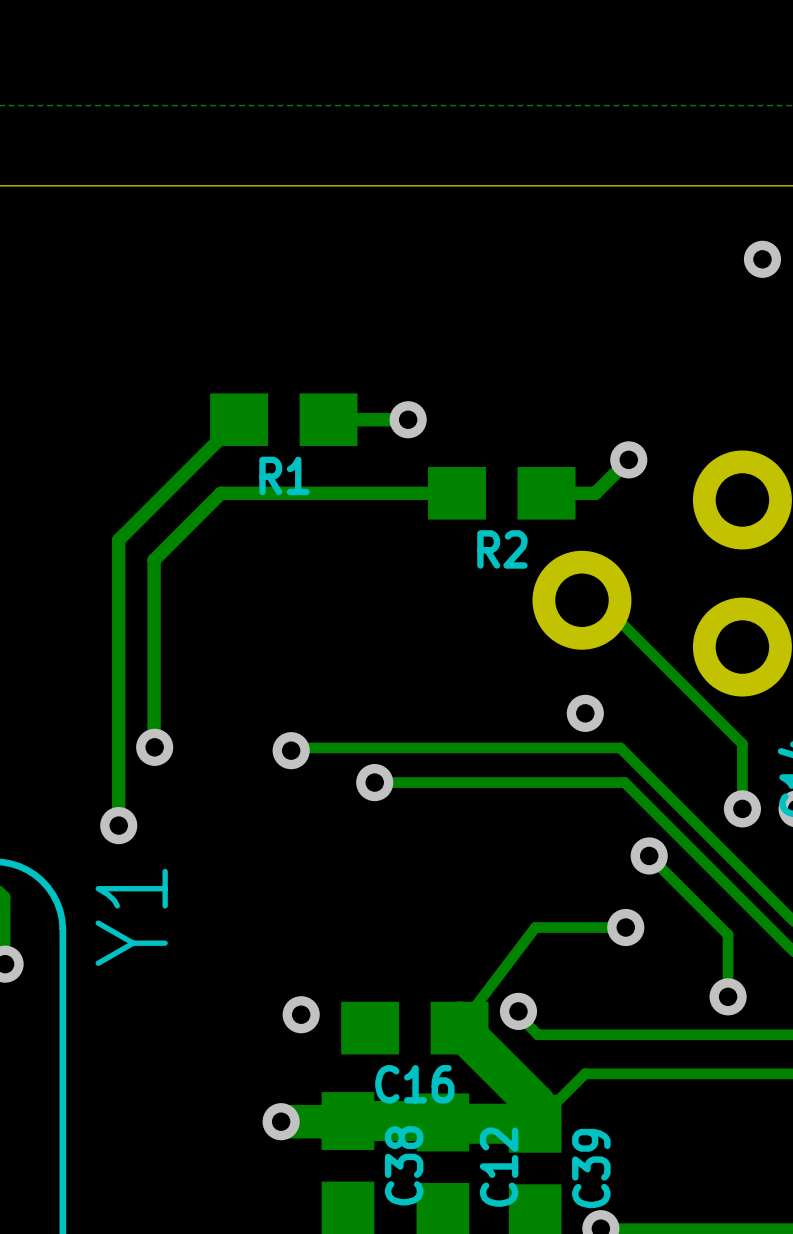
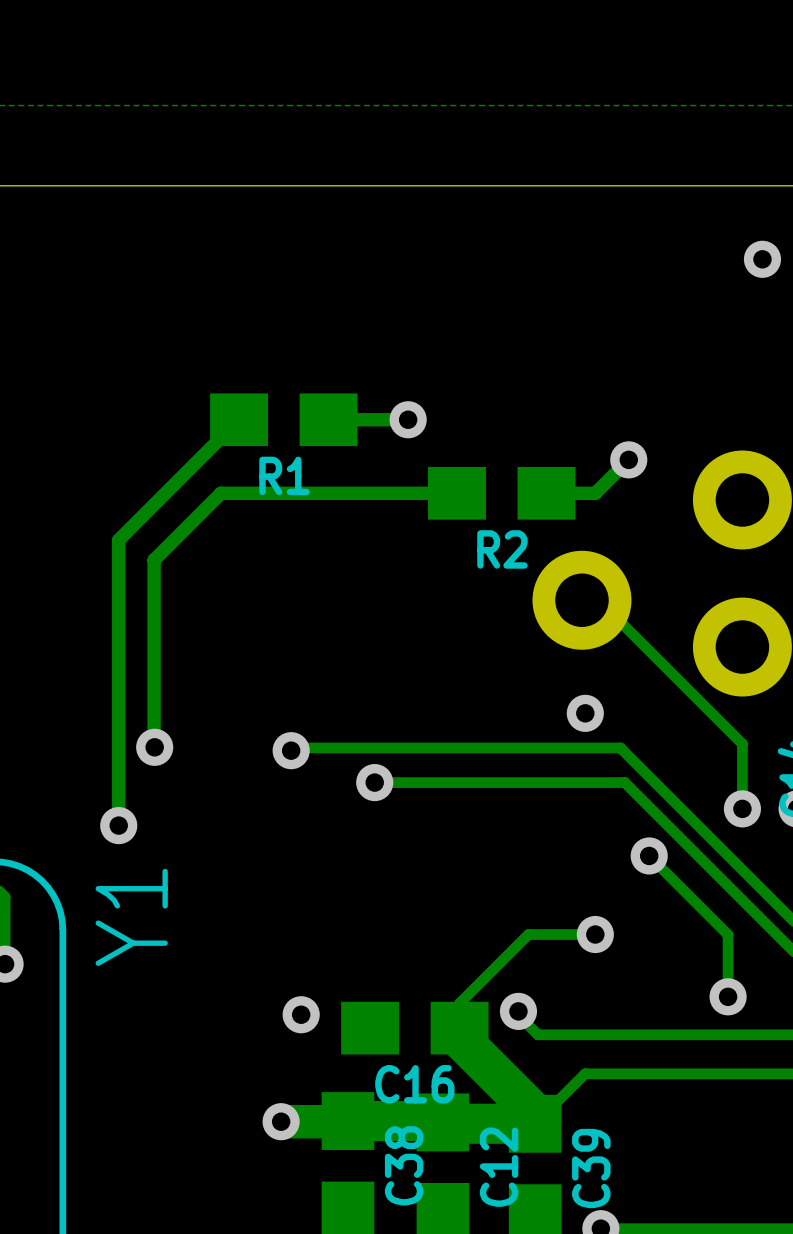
track: (535, 927) (461, 1024) -> none
track: (625, 927) (535, 927) -> none
via position: (625, 927) -> (595, 934)
track: none -> (595, 934) (528, 934) (459, 1003) (459, 1021)
track: (472, 1009) (472, 1014) (459, 1028) (535, 1103) (535, 1113) -> (459, 1038) (535, 1113)

